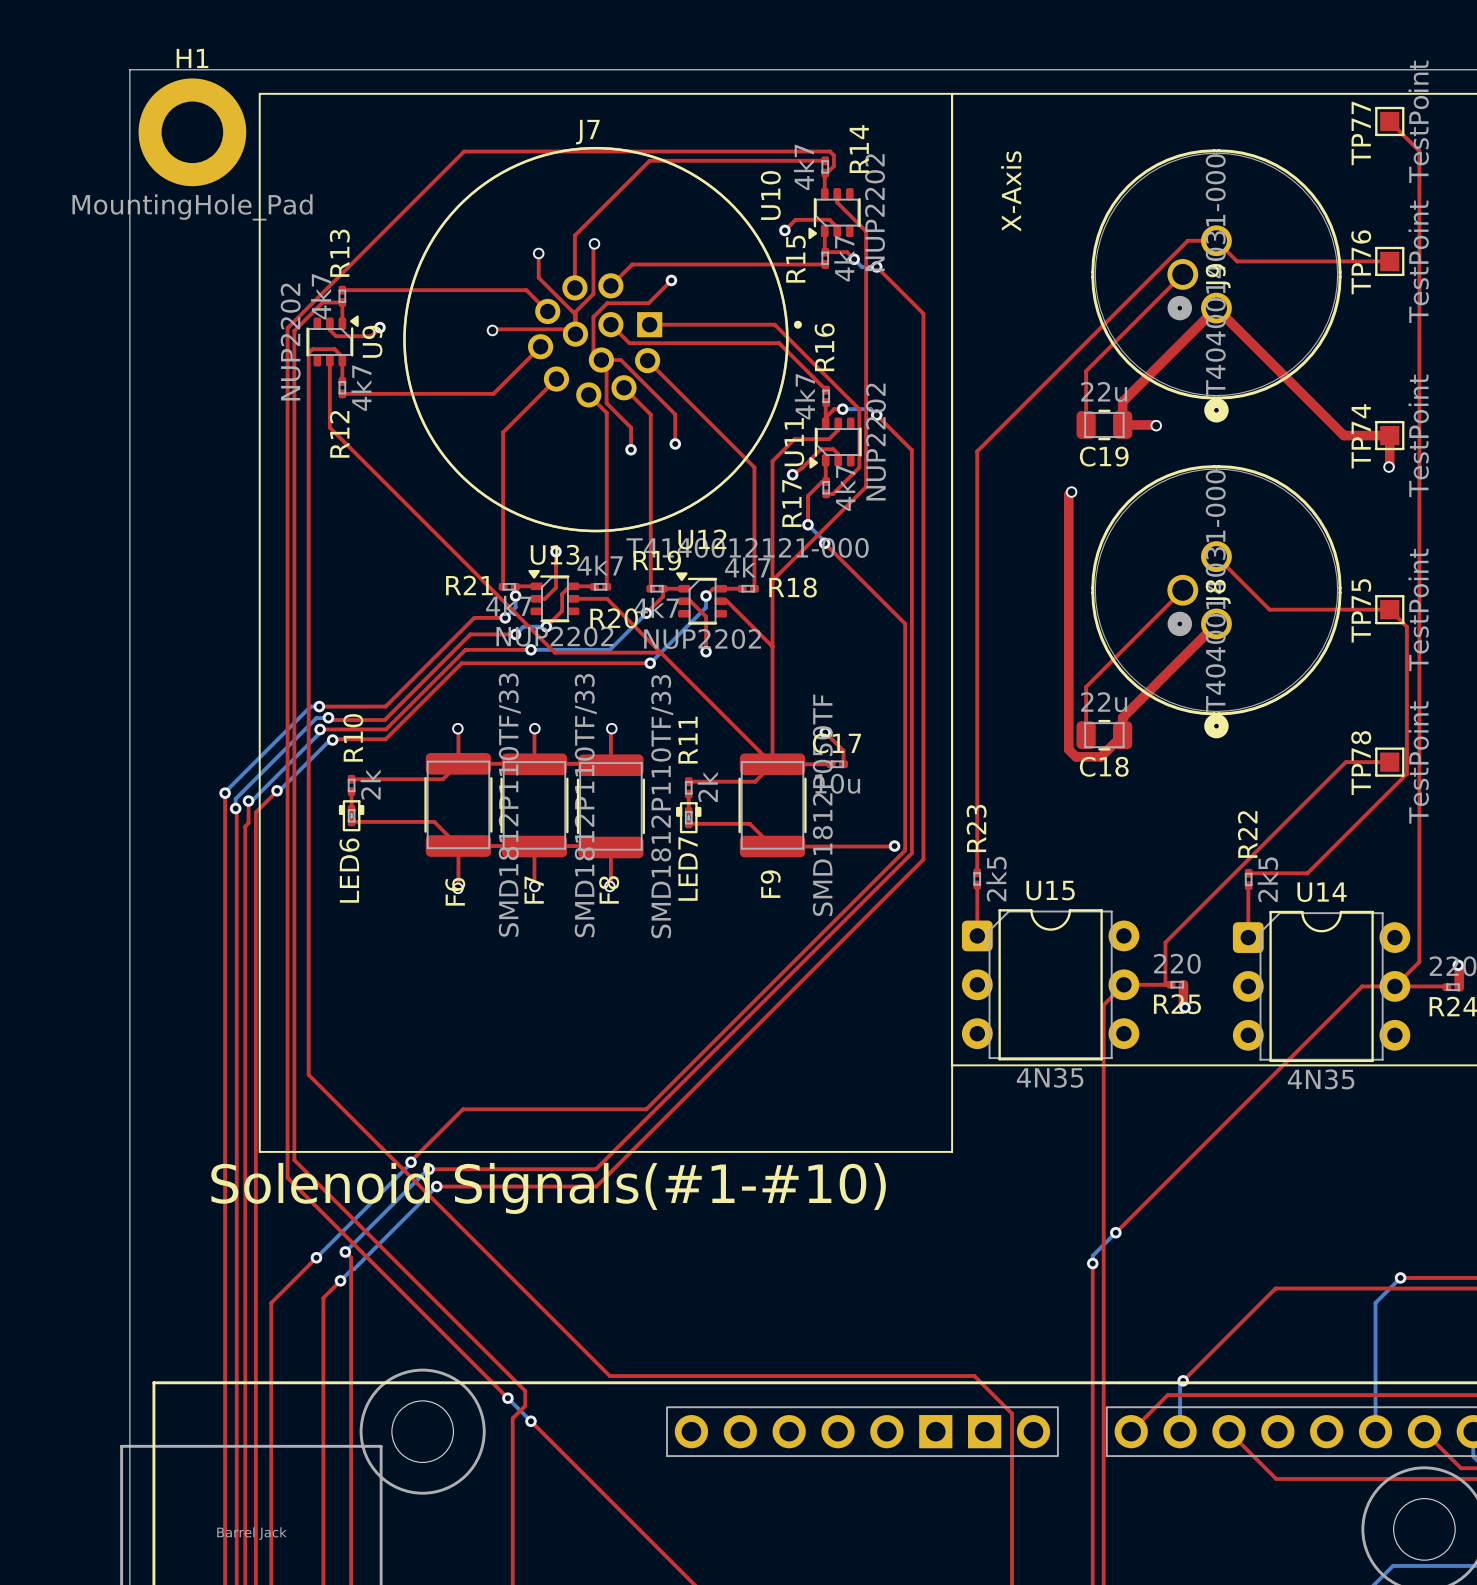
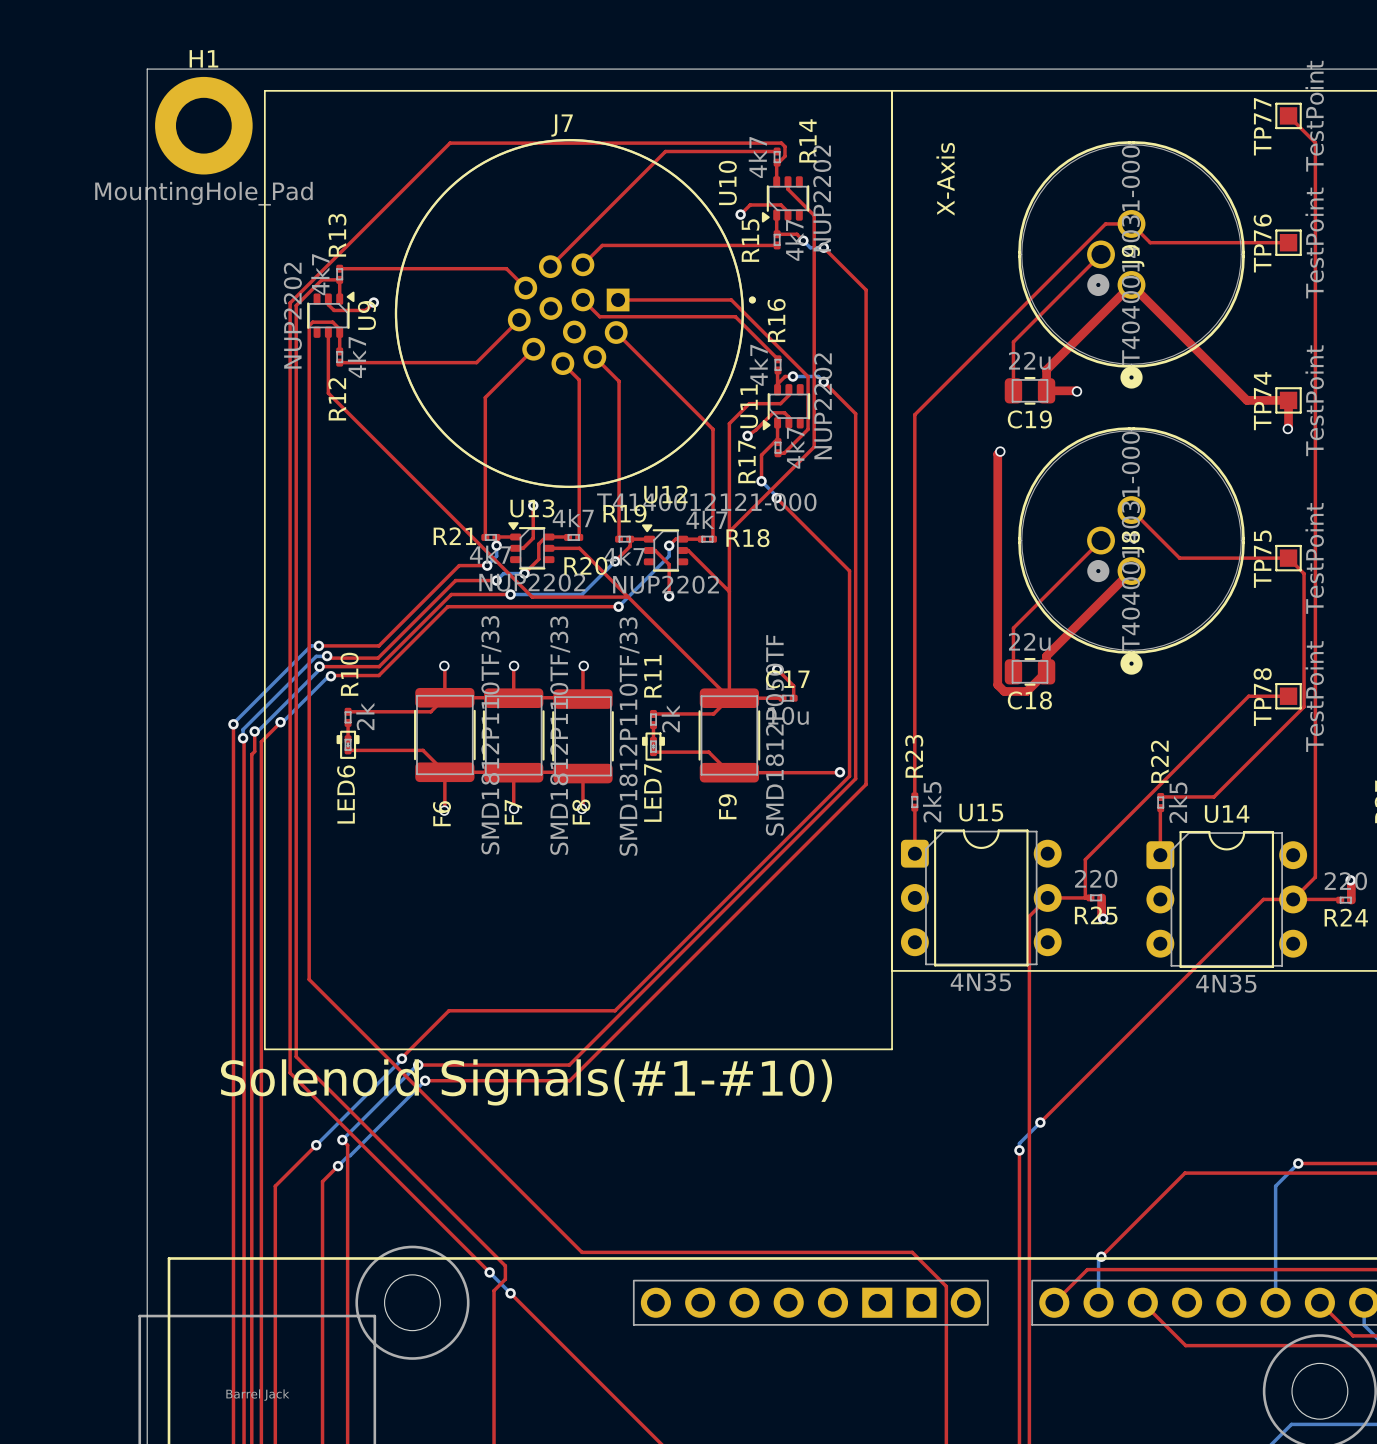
top track: (702, 160) (649, 160) (574, 235) (574, 287) -> (665, 151) (550, 266)
top track: (594, 243) (593, 294) (575, 311) (575, 334) (570, 329) (492, 330) -> none
via: (594, 243) -> none
top track: (538, 253) (538, 277) (575, 314) -> none
via: (538, 253) -> none
top track: (671, 280) (648, 303) (607, 303) (593, 317) (593, 352) (606, 365) (606, 403) (631, 427) (631, 449) -> none
via: (671, 280) -> none
via: (492, 330) -> none
top track: (601, 360) (620, 360) (675, 414) (675, 443) -> none
via: (675, 443) -> none
via: (631, 449) -> none

